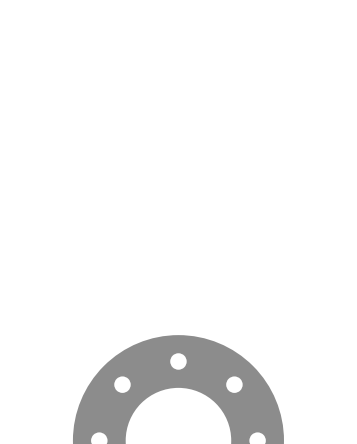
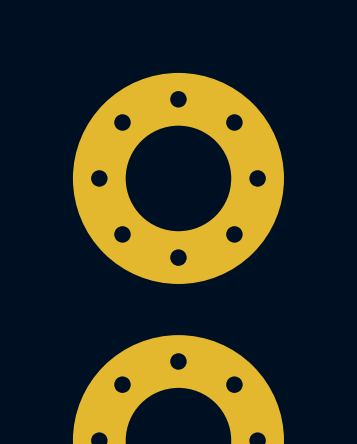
part: none -> (178, 178)

